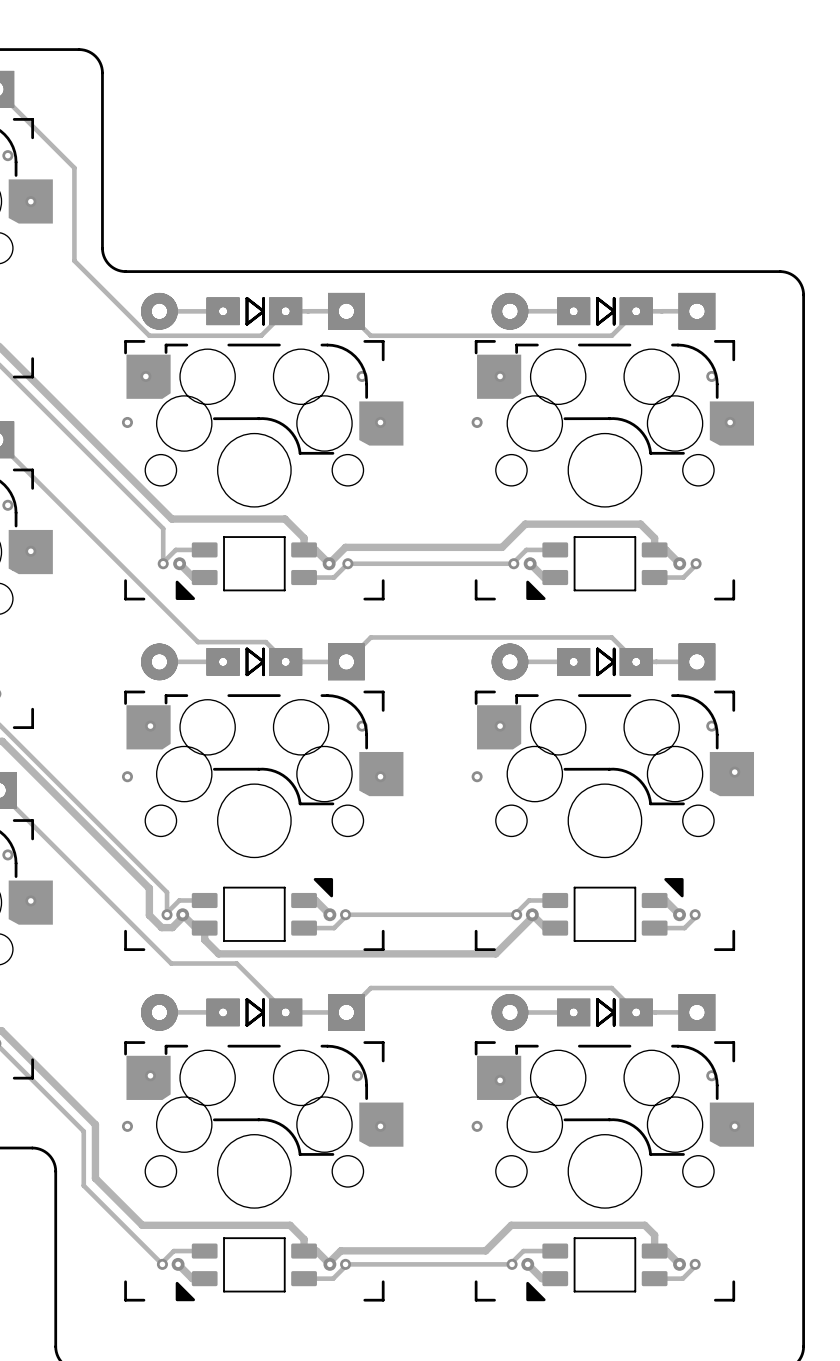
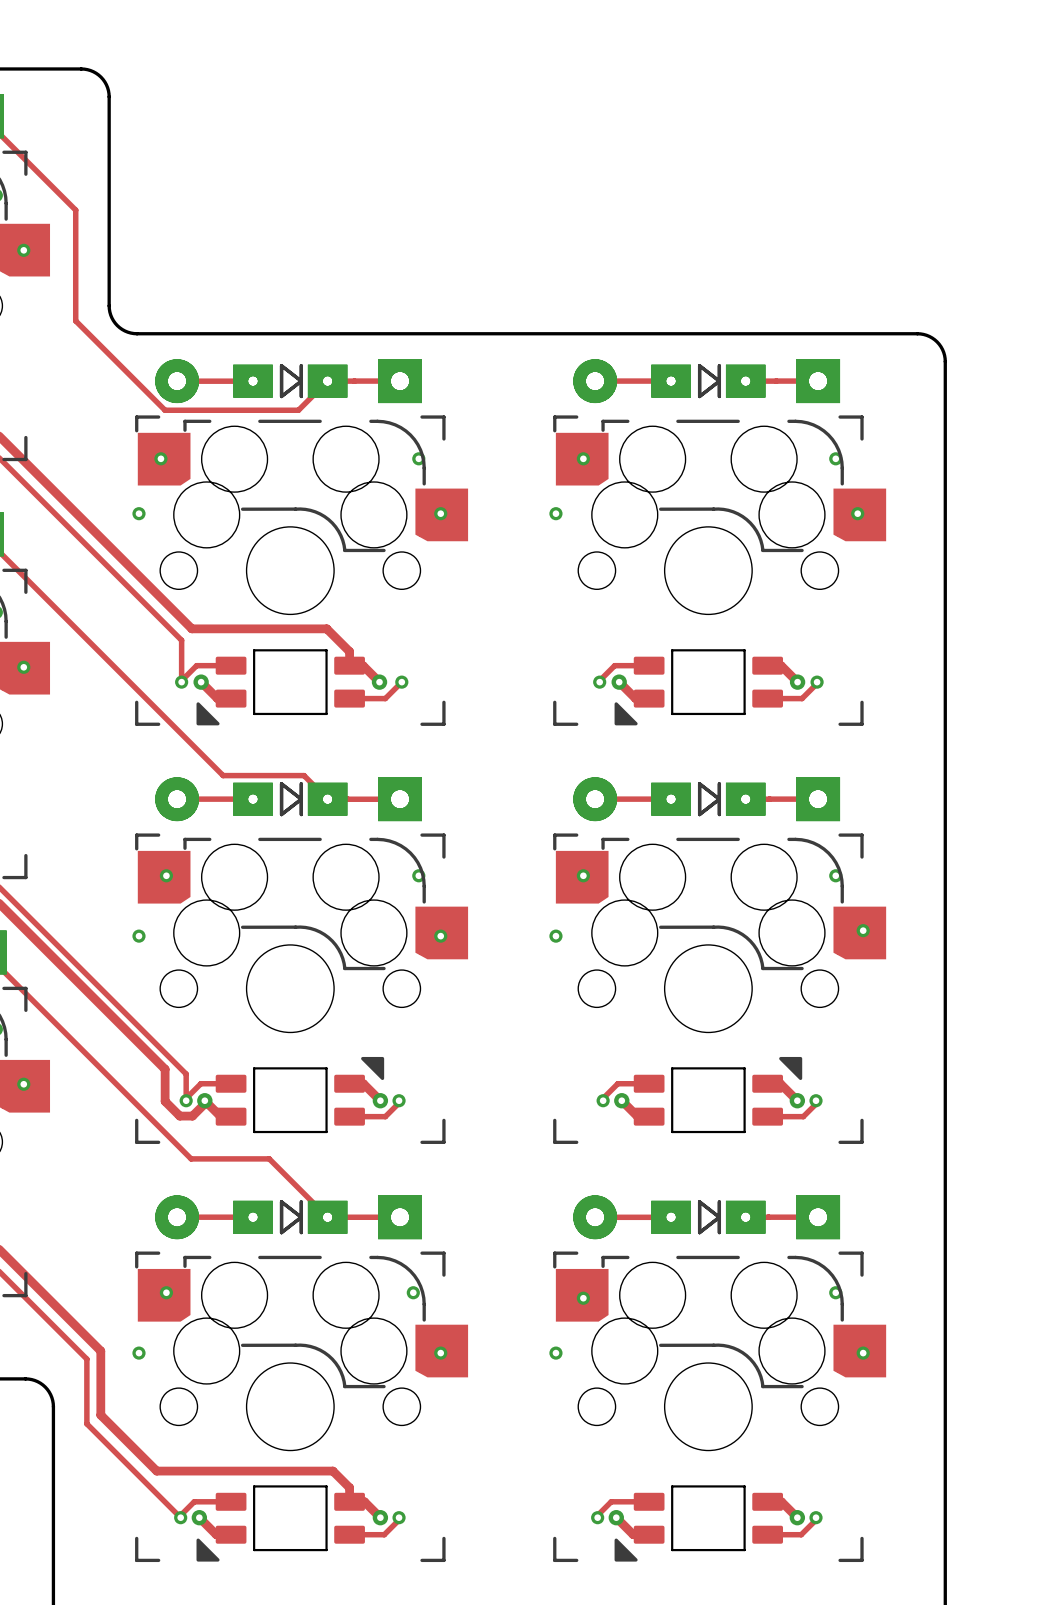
track: (346, 311) (370, 335) (611, 335) (636, 311) -> none
track: (654, 549) (654, 538) (640, 524) (525, 524) (502, 547) (345, 547) (329, 563) -> none
track: (347, 563) (513, 563) -> none
track: (346, 661) (370, 637) (611, 637) (636, 661) -> none
track: (345, 914) (516, 914) -> none
track: (532, 914) (532, 917) (495, 953) (218, 953) (204, 939) (204, 928) -> none
track: (346, 1012) (370, 988) (611, 988) (636, 1012) -> none
track: (654, 1251) (654, 1235) (644, 1225) (511, 1225) (485, 1250) (340, 1250) (329, 1261) (329, 1264) -> none
track: (345, 1264) (512, 1264) -> none

